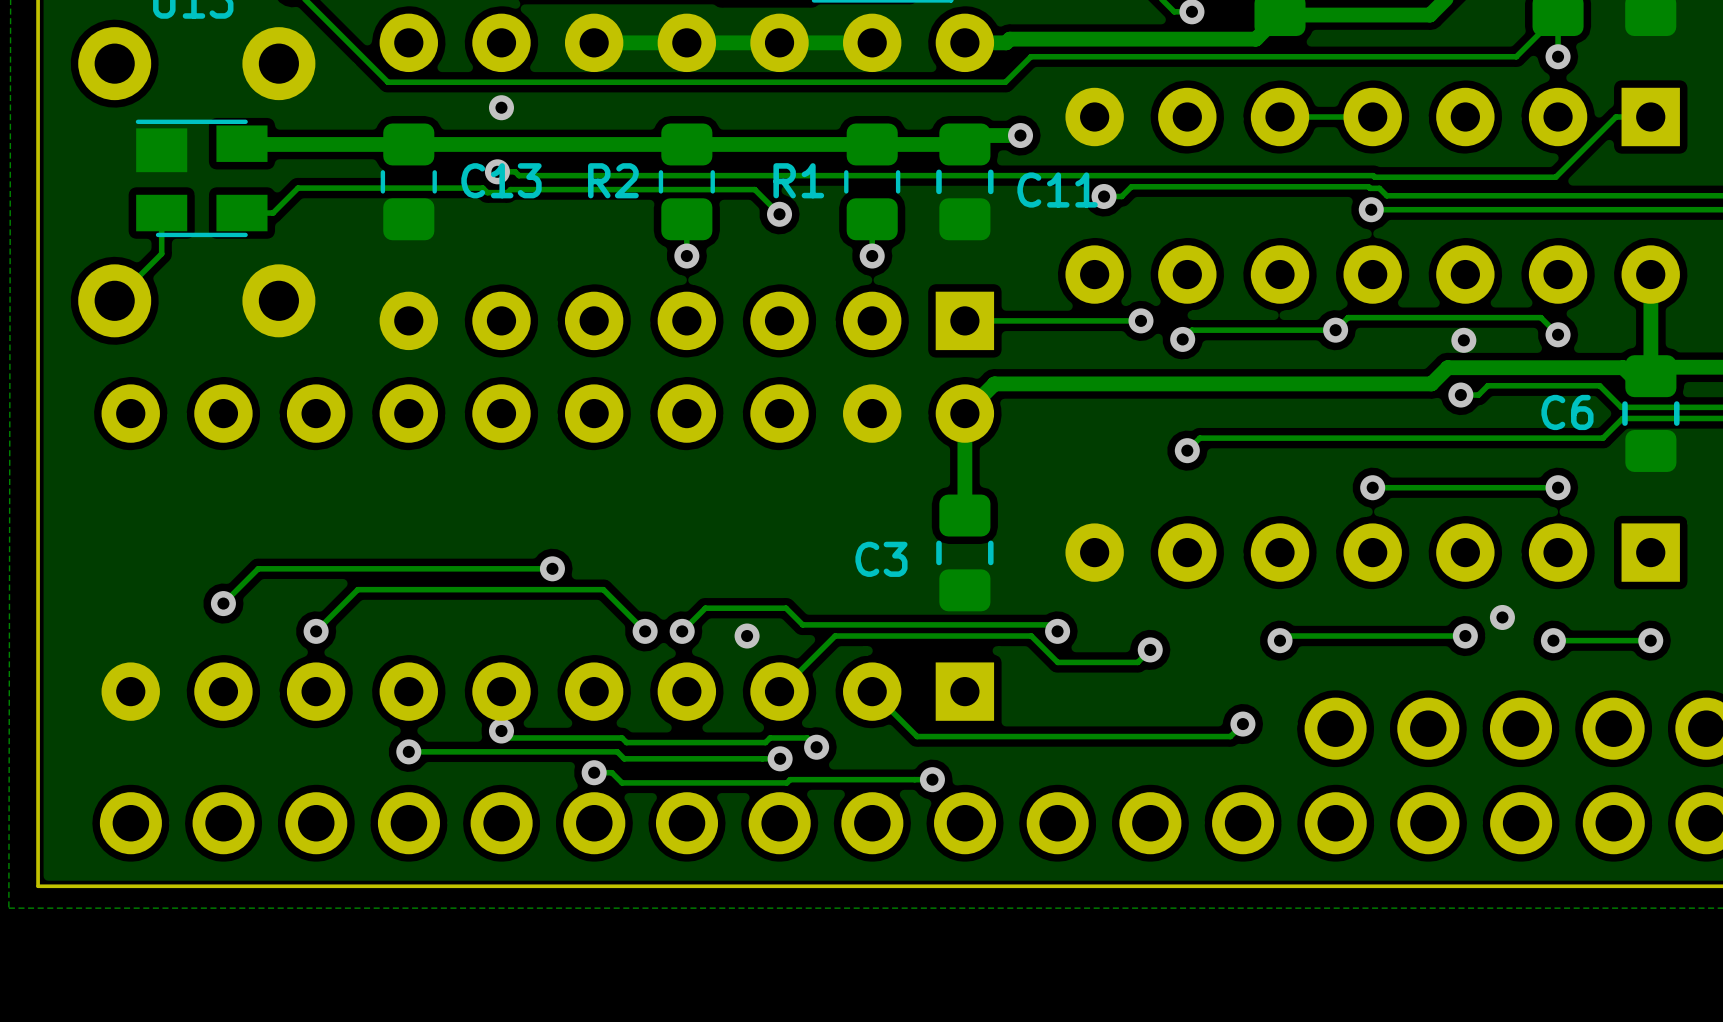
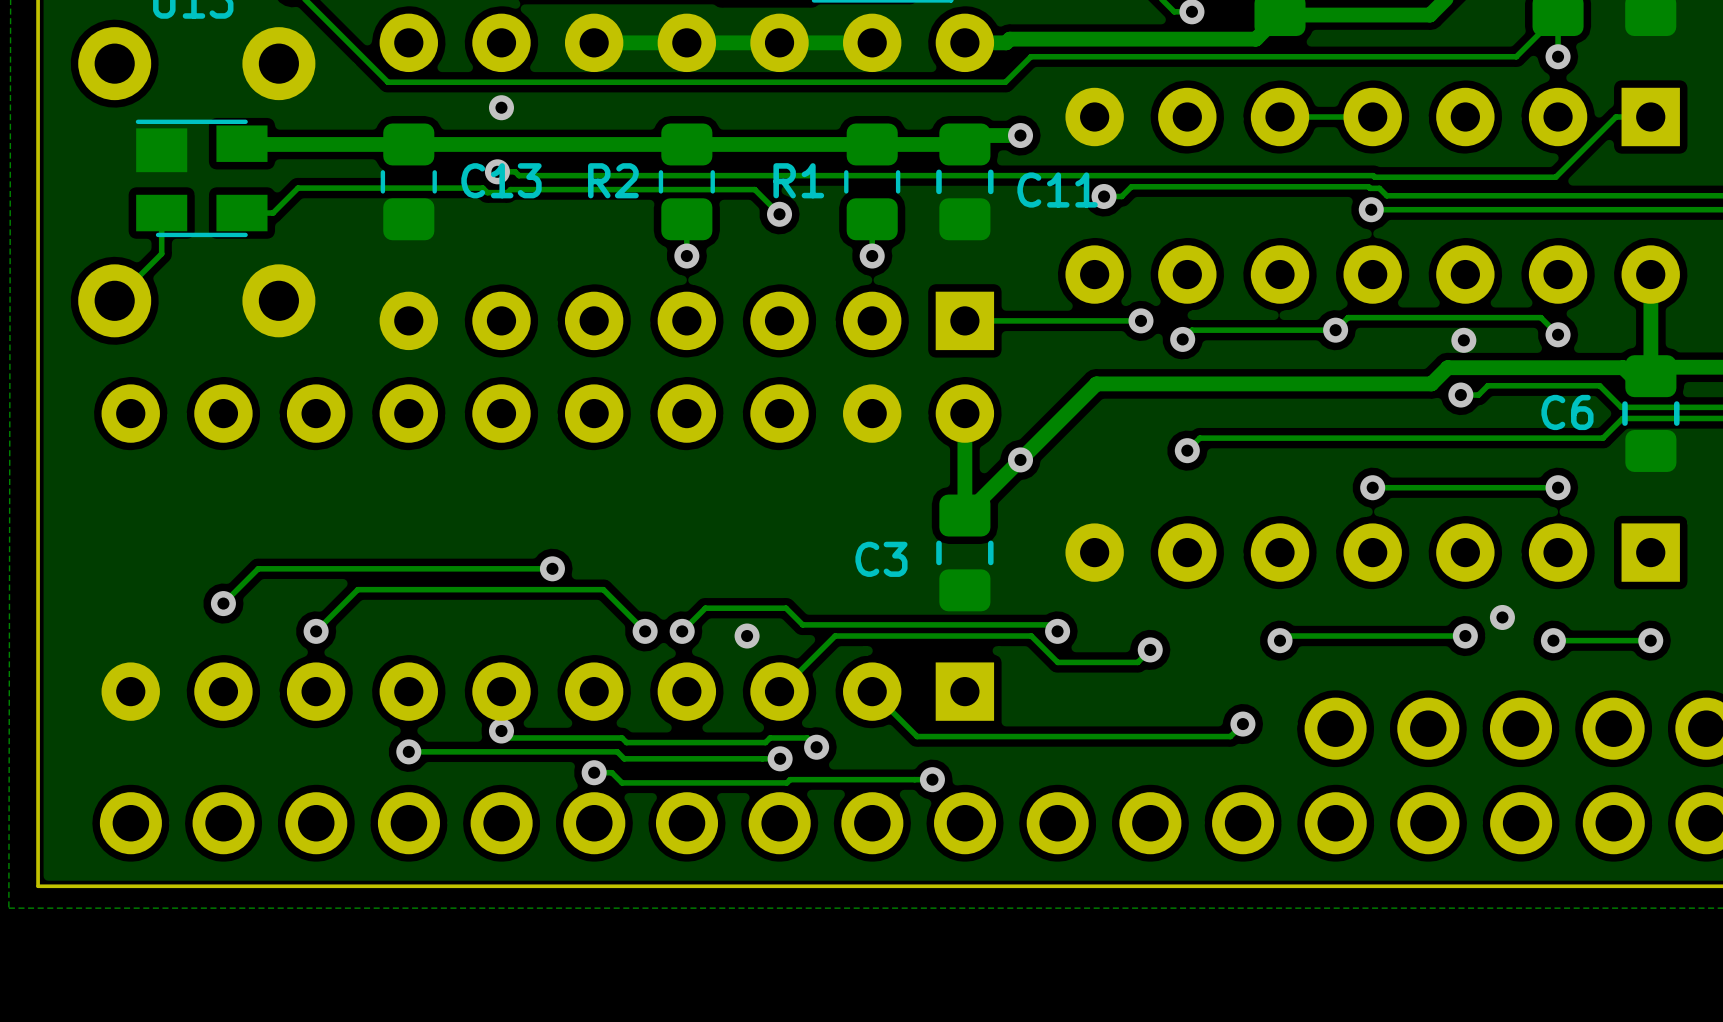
track: (1096, 383) (994, 383) (964, 413) -> (1096, 383) (964, 515)
via: none -> (1020, 459)

